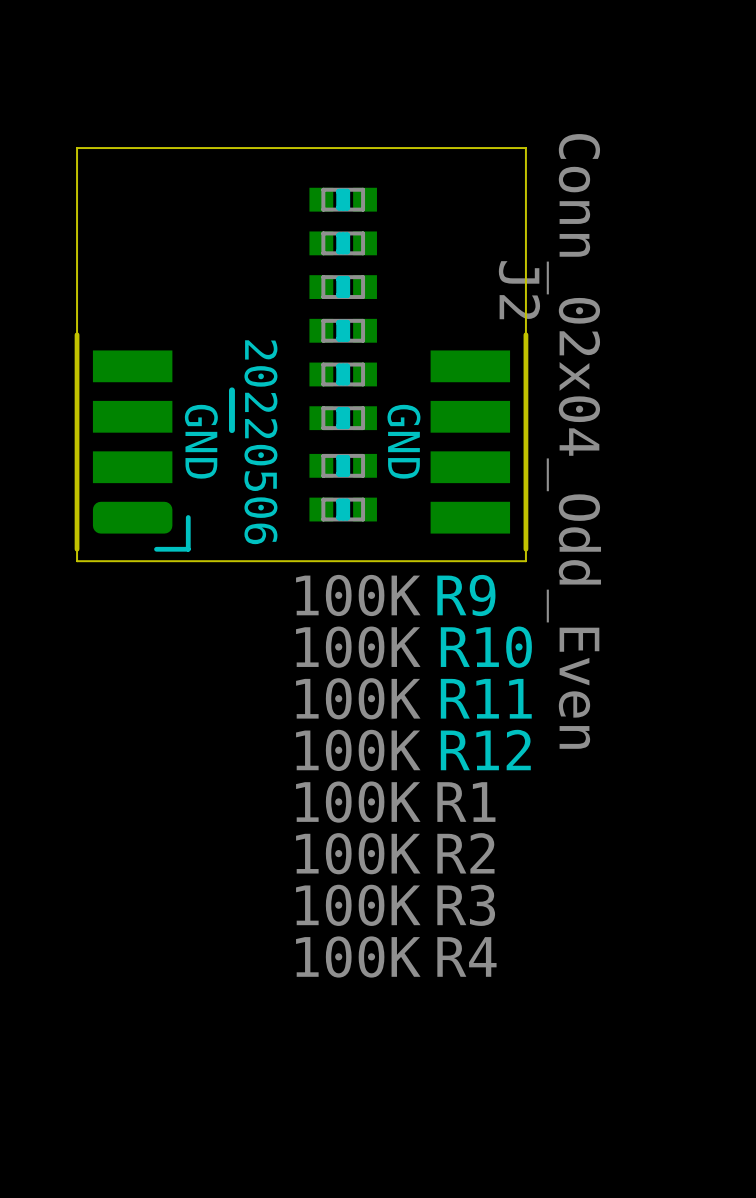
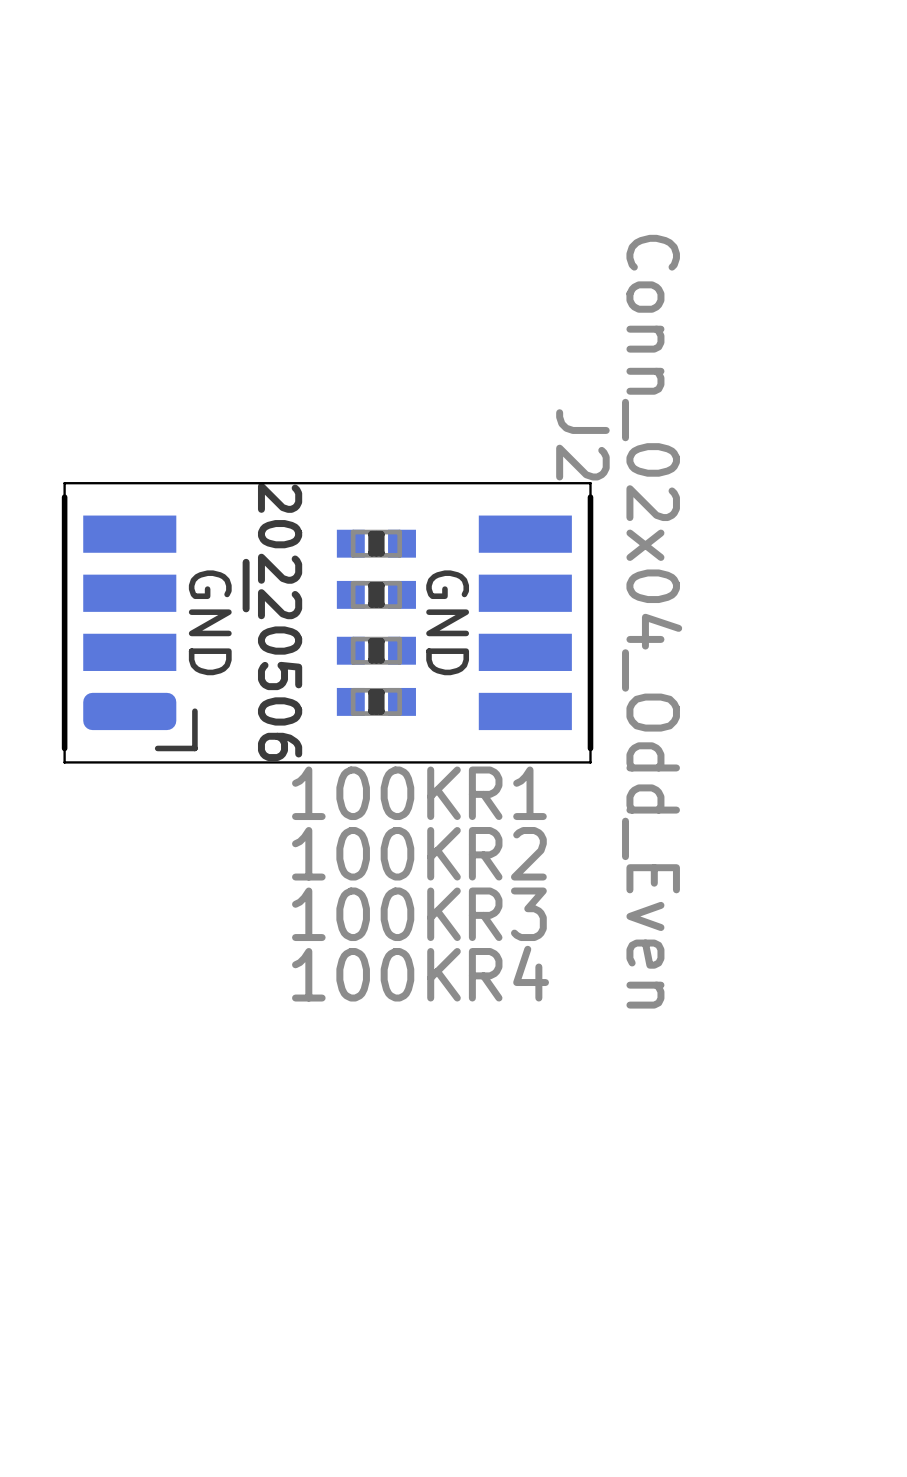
R9: 100K (343, 199) -> none
R10: 100K (343, 243) -> none
R11: 100K (343, 287) -> none
board edge: (525, 322) (525, 148) (77, 148) (77, 322) -> (590, 483) (64, 483)
R12: 100K (343, 330) -> none
R1 value position: 100K (358, 802) -> 100K (376, 793)
R1 name position: R1 (466, 802) -> R1 (507, 793)
R2 value position: 100K (358, 853) -> 100K (376, 853)
R2 name position: R2 (465, 853) -> R2 (507, 853)
R3 value position: 100K (358, 905) -> 100K (376, 914)
R3 name position: R3 (466, 905) -> R3 (507, 914)
R4 value position: 100K (358, 956) -> 100K (376, 974)
R4 name position: R4 (466, 956) -> R4 (508, 973)

